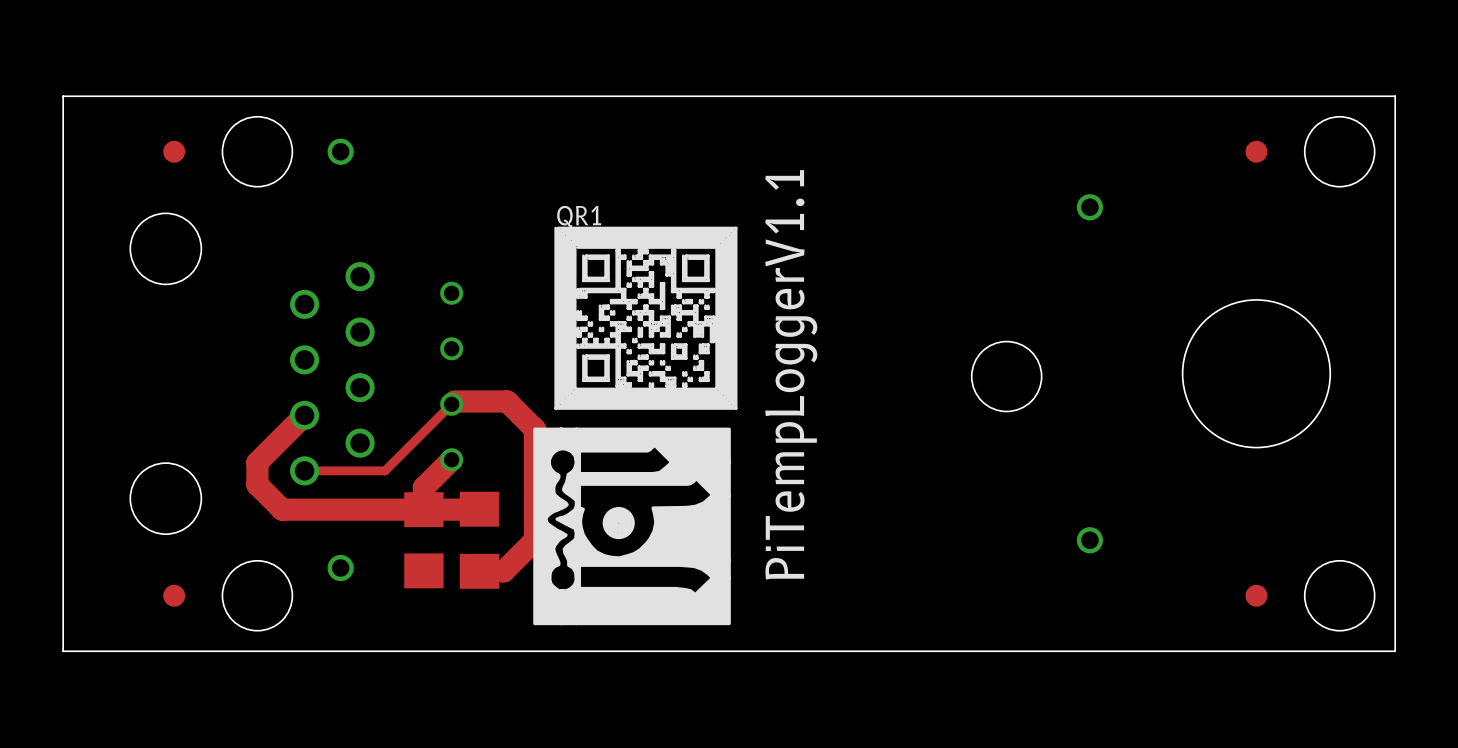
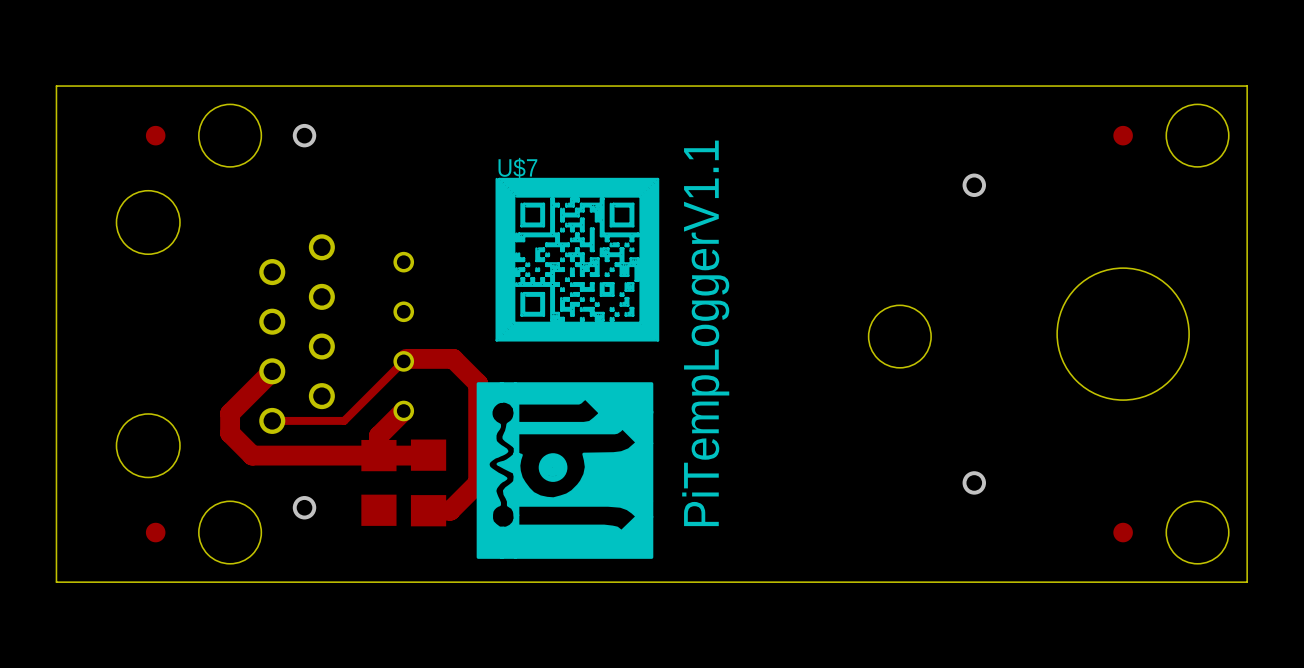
U$7: none -> (577, 259)
QR1: (645, 318) -> none

